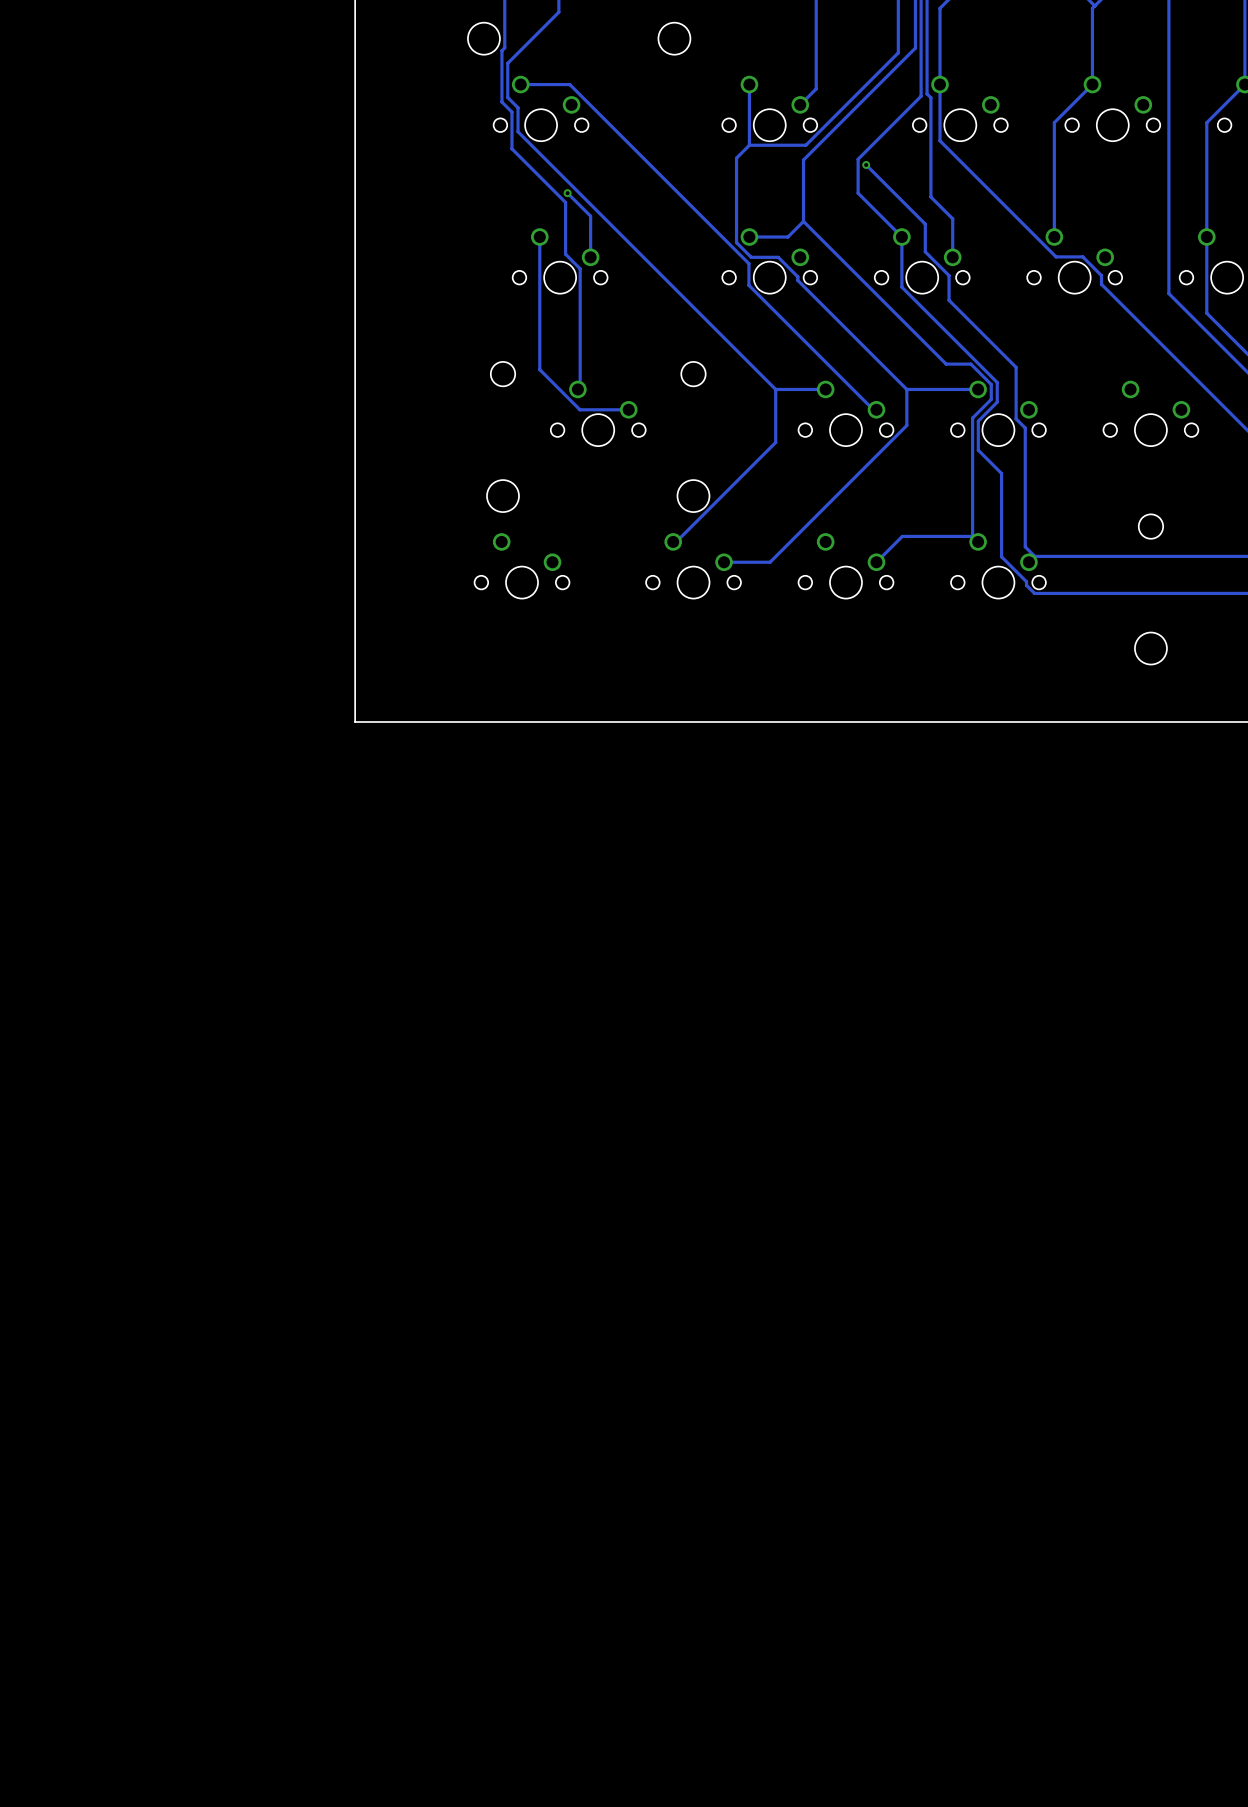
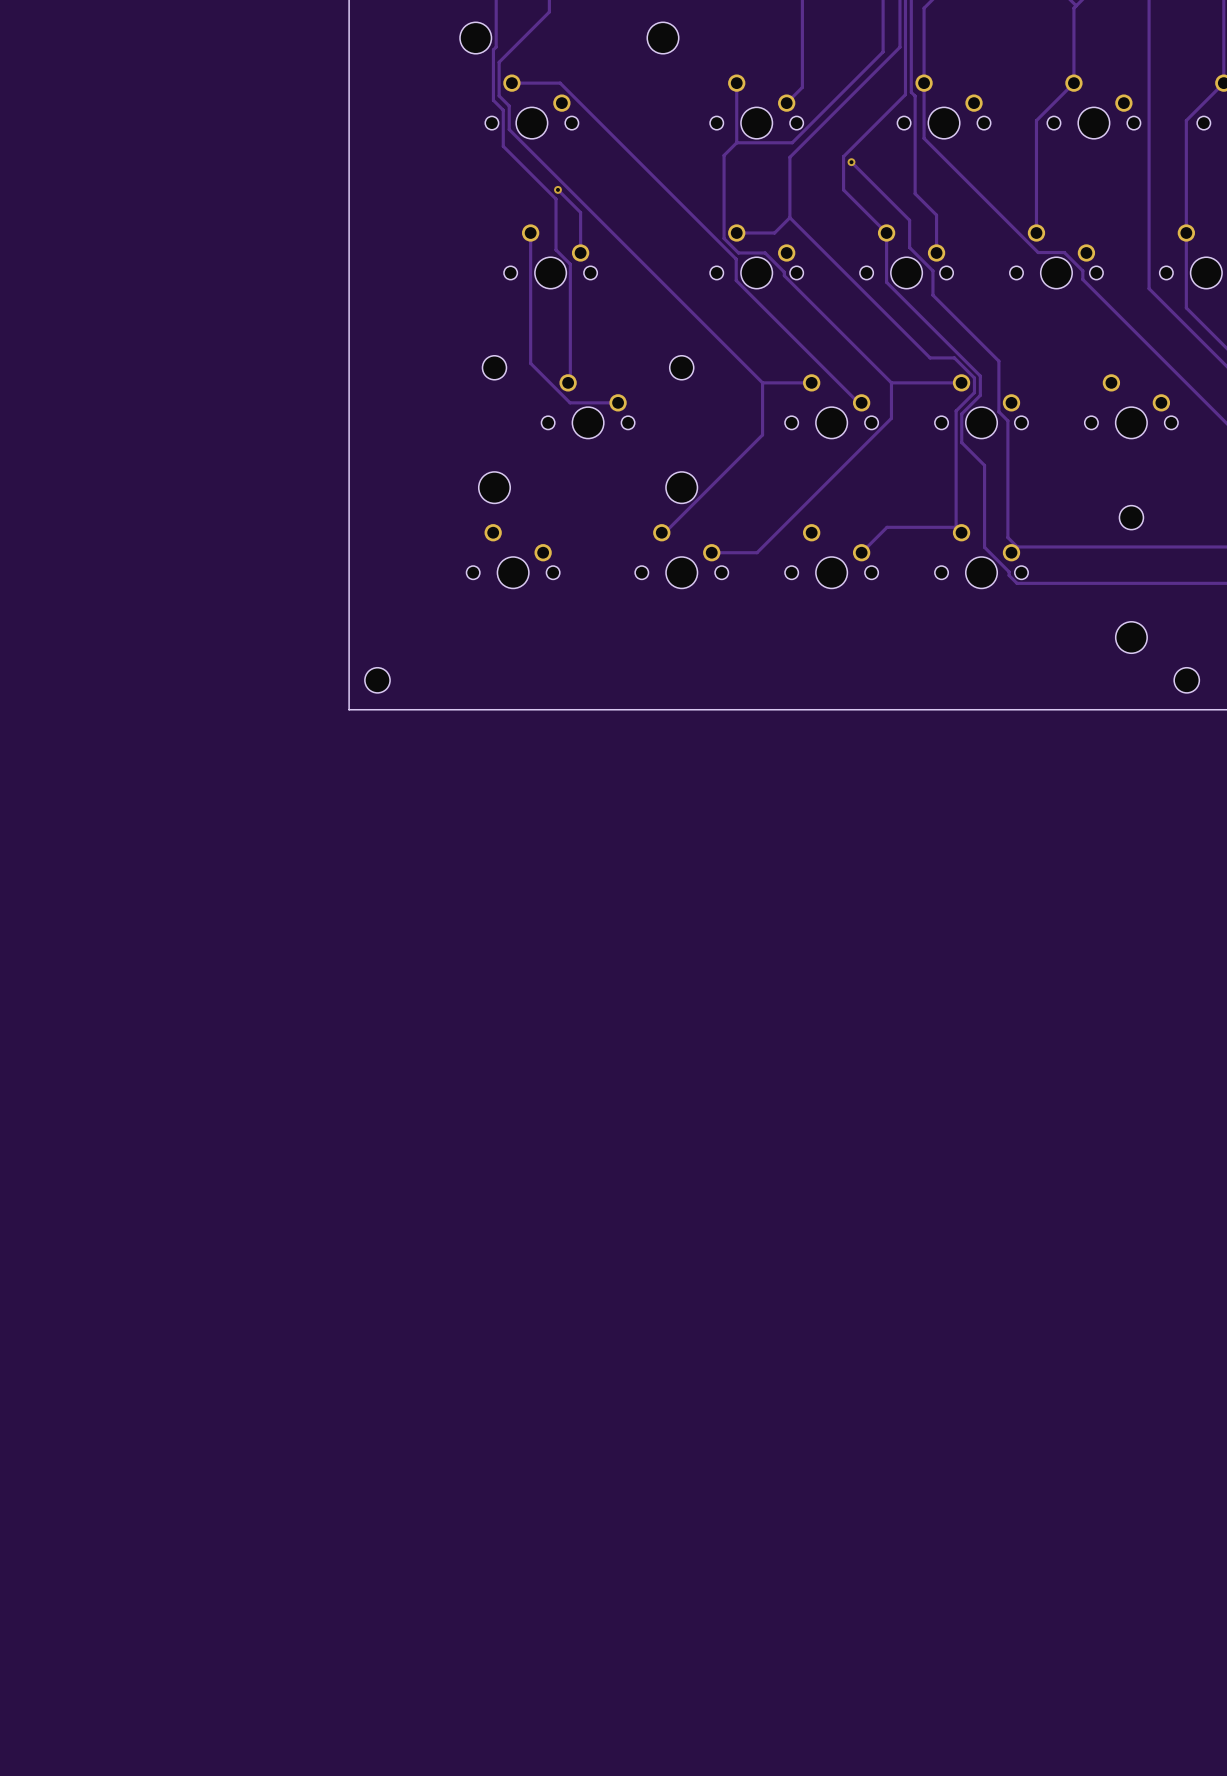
part: none -> (377, 680)
part: none -> (1186, 680)

